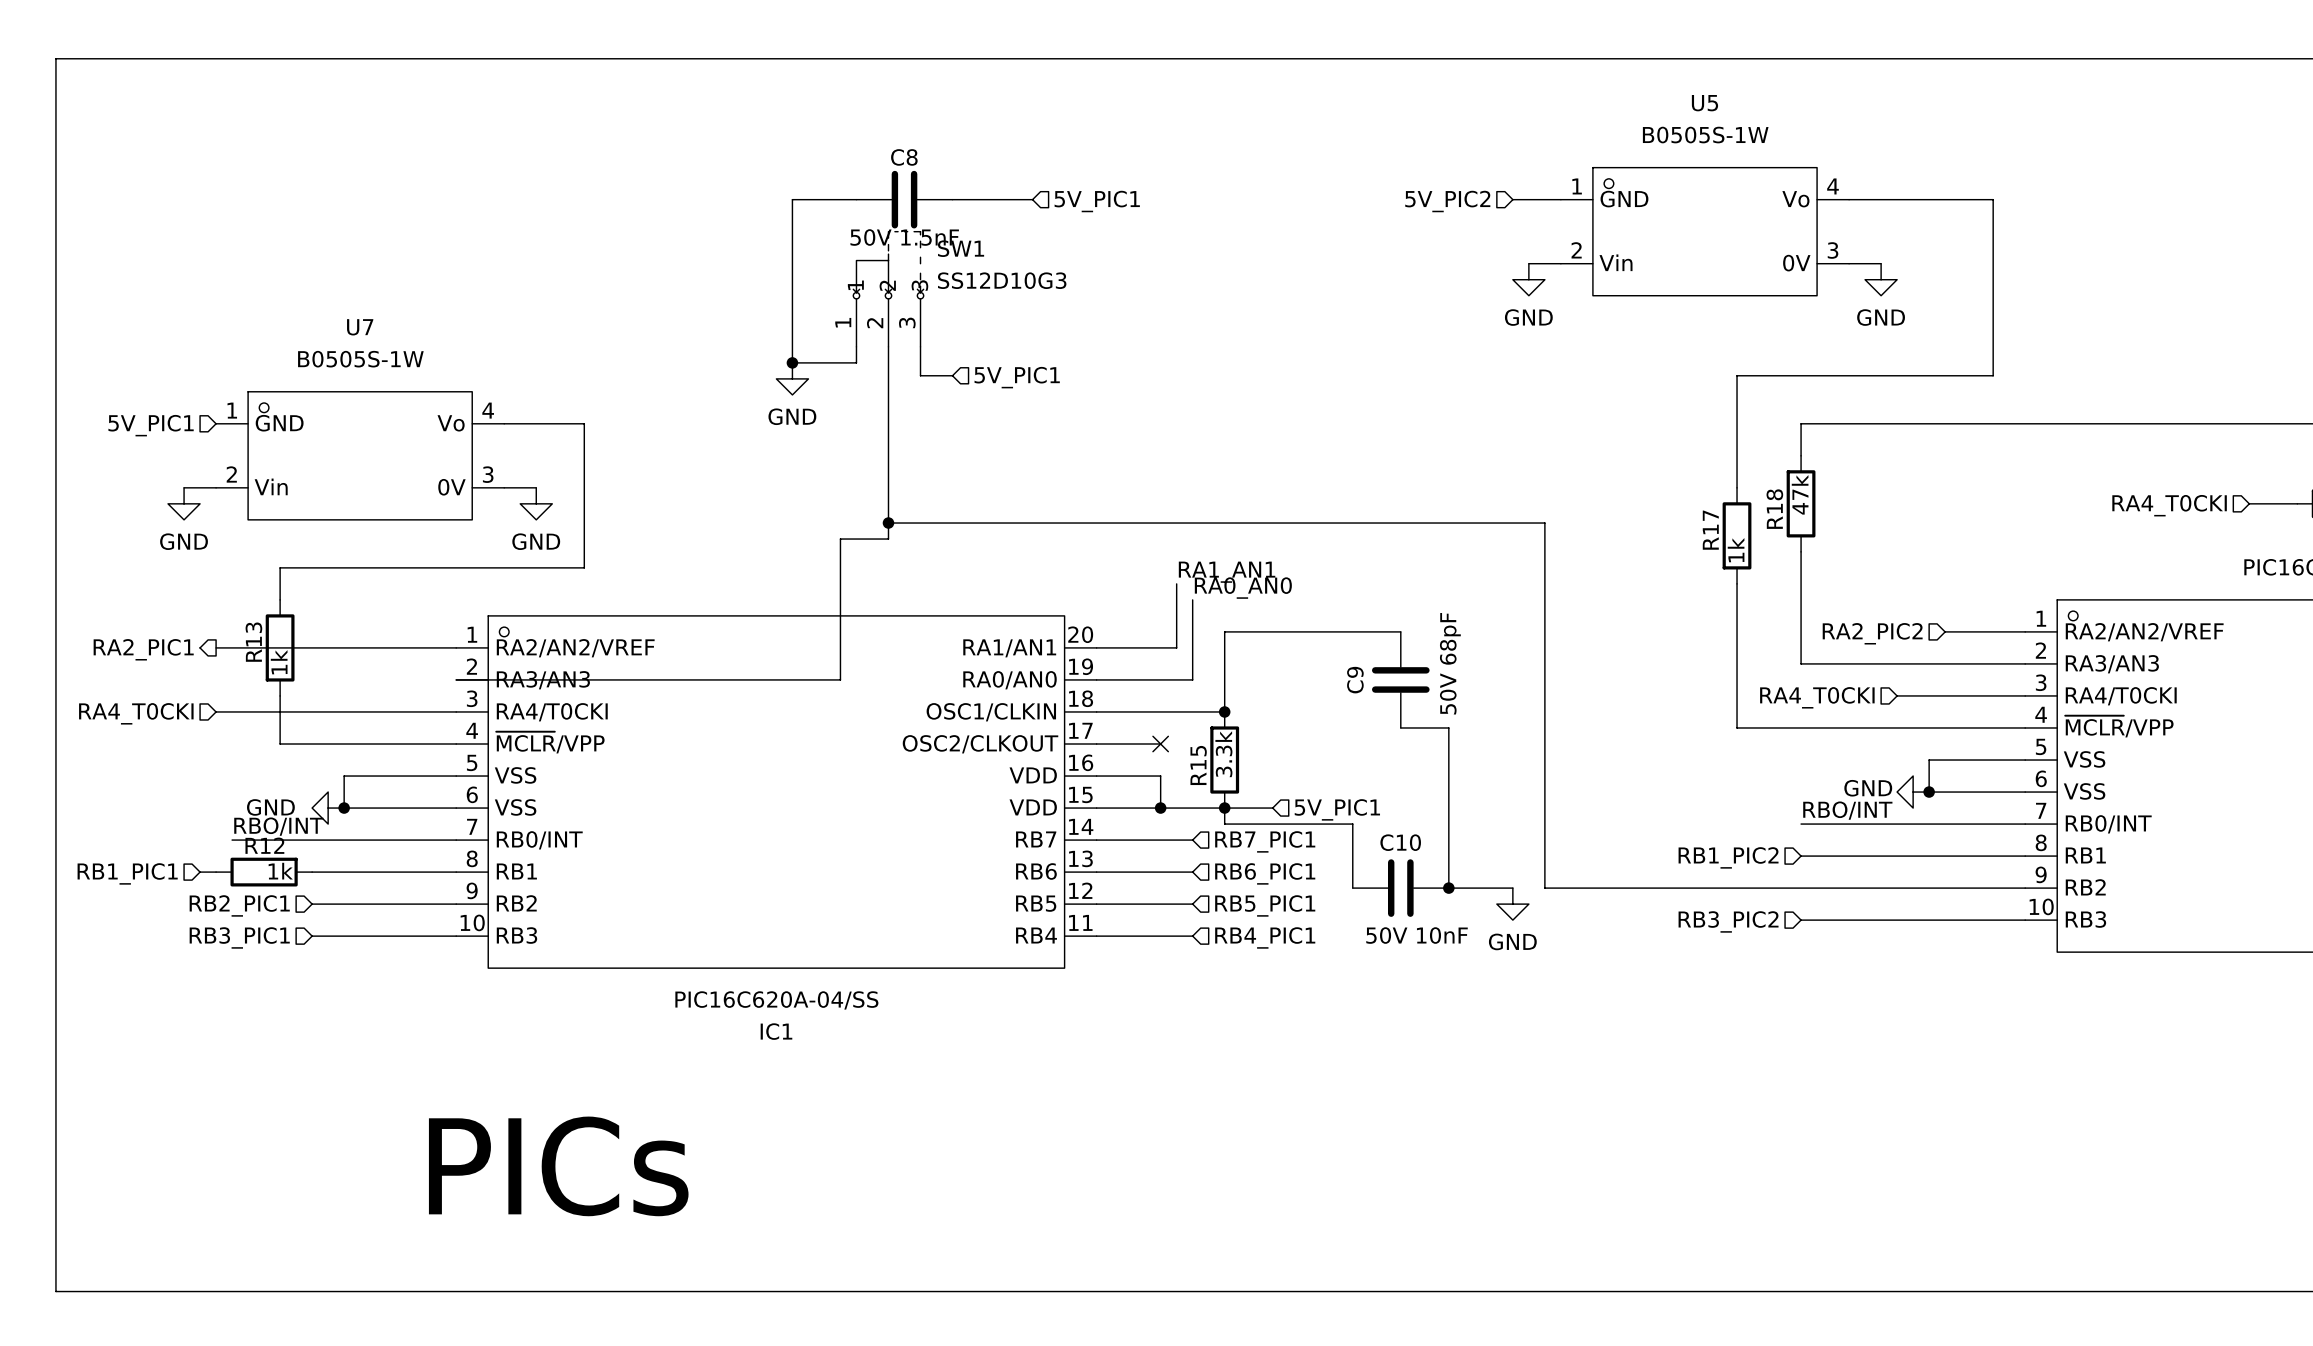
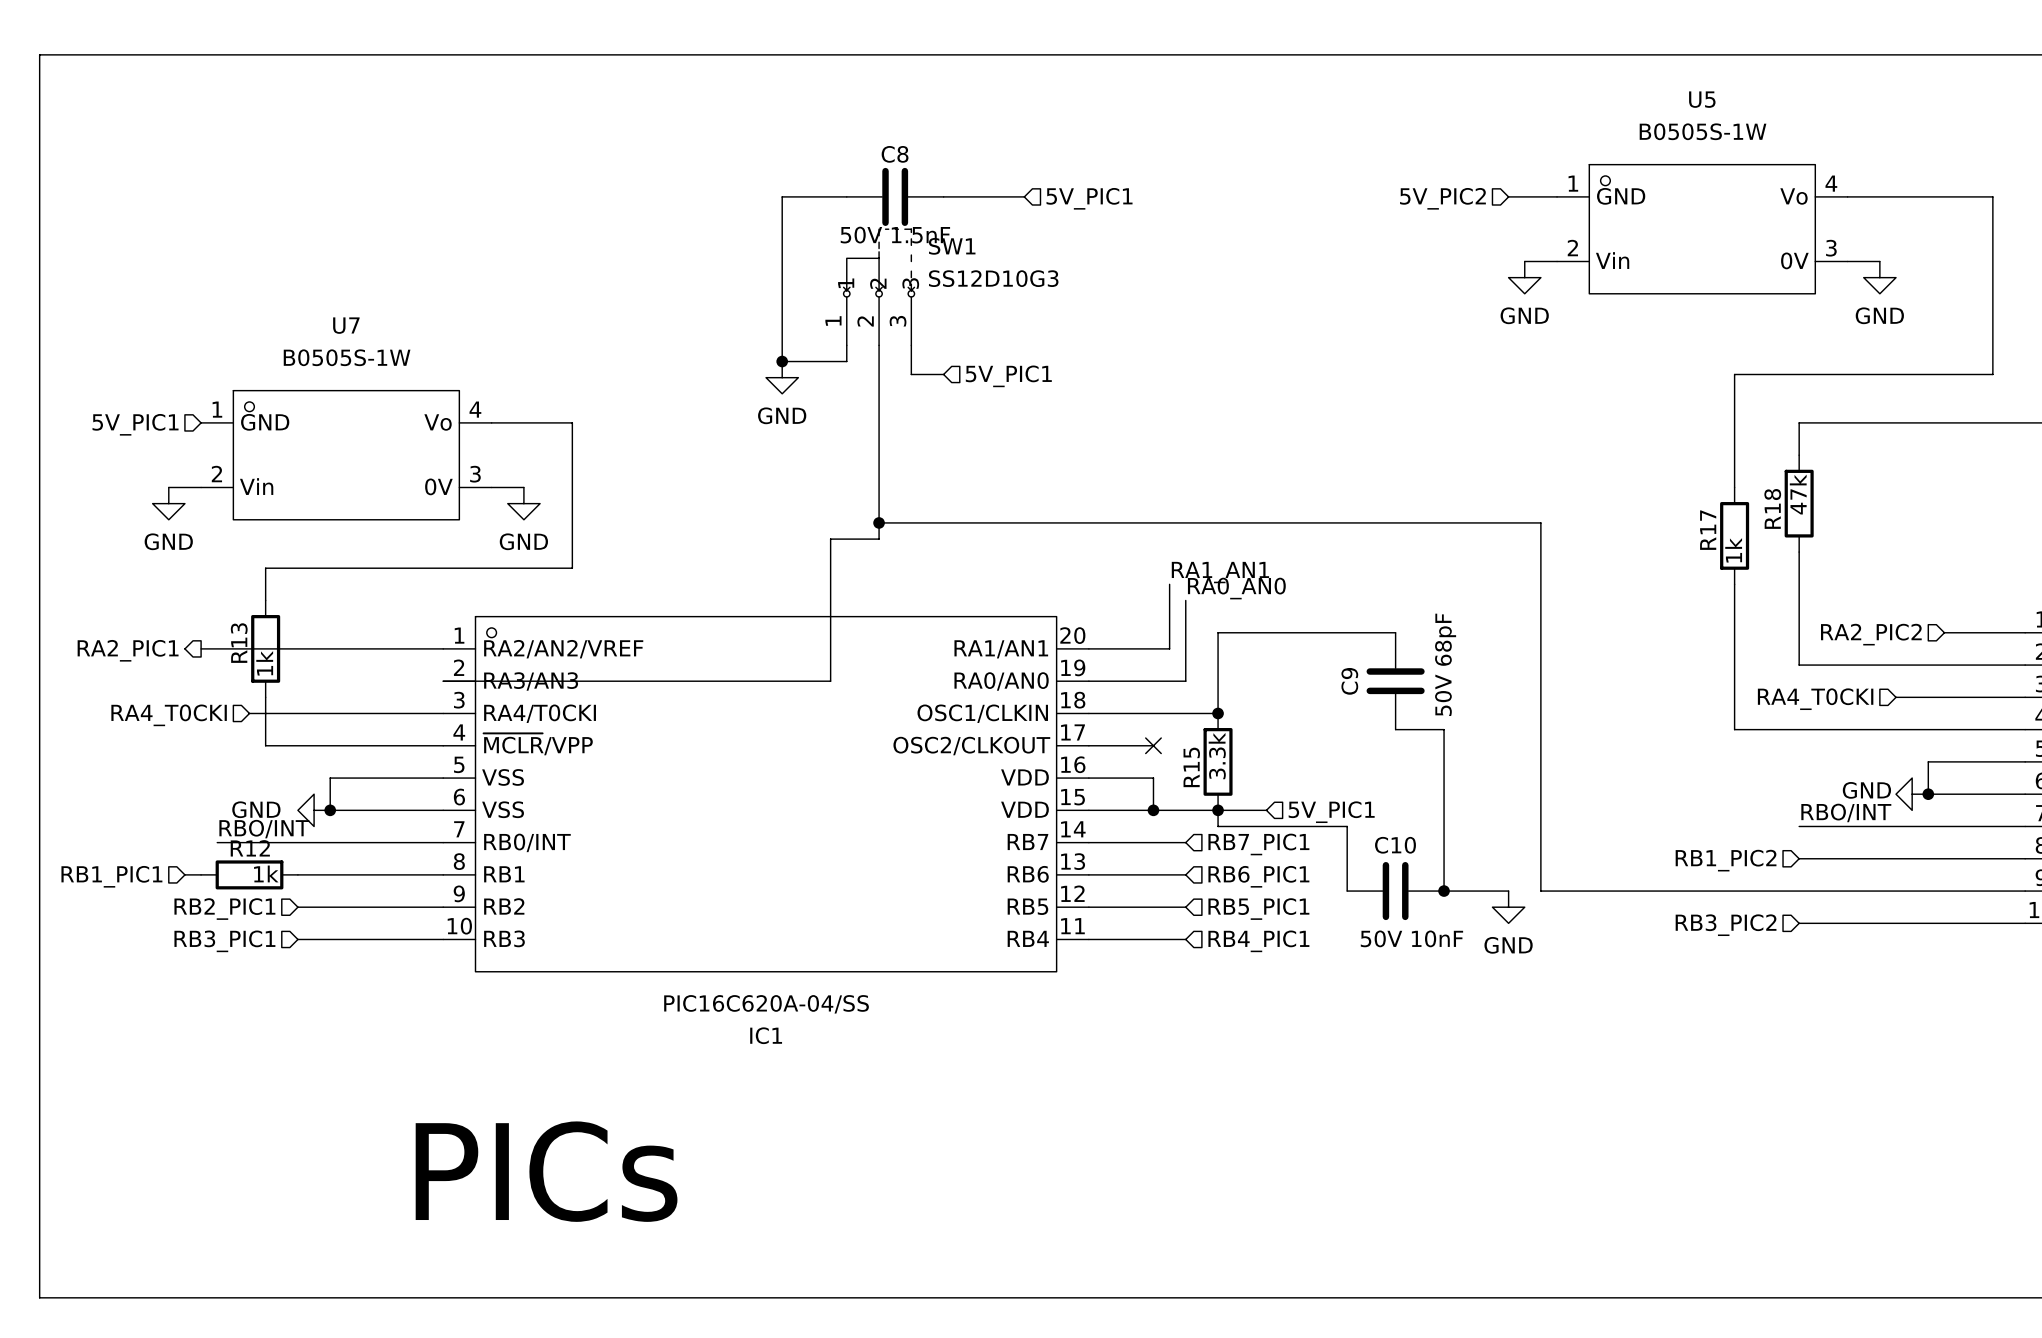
wire: (216, 711) (264, 711) -> none
hierarchical label position: RA4_T0CKI (136, 713) -> RA4_T0CKI (169, 715)

